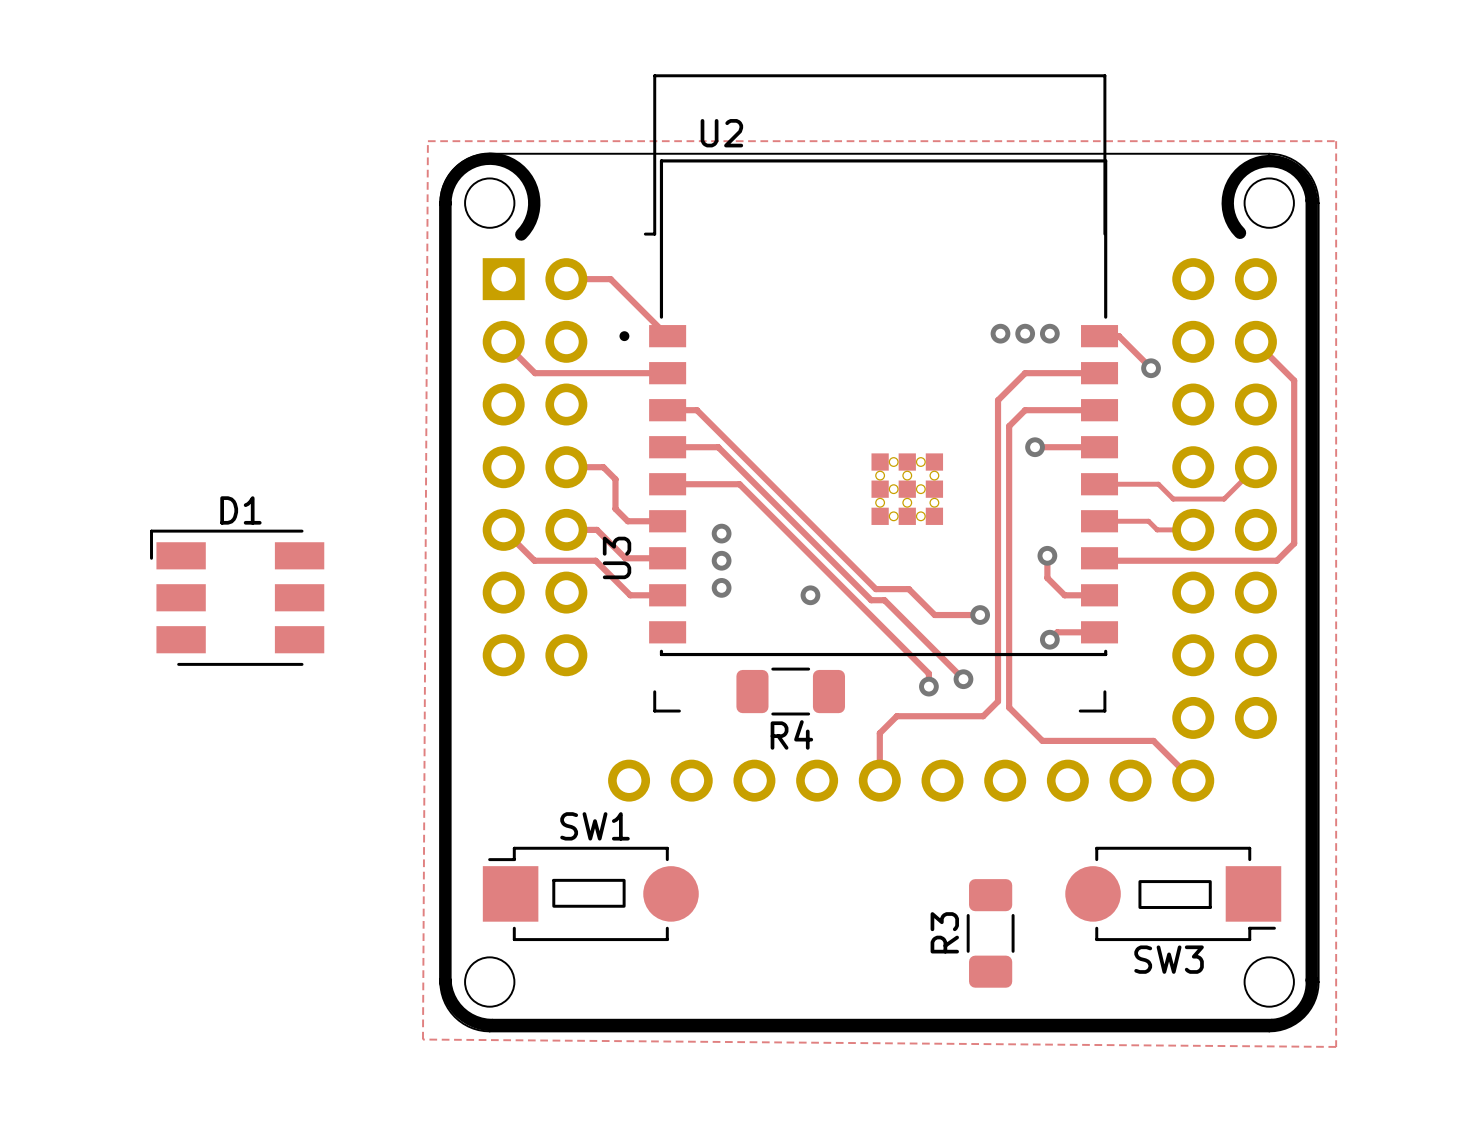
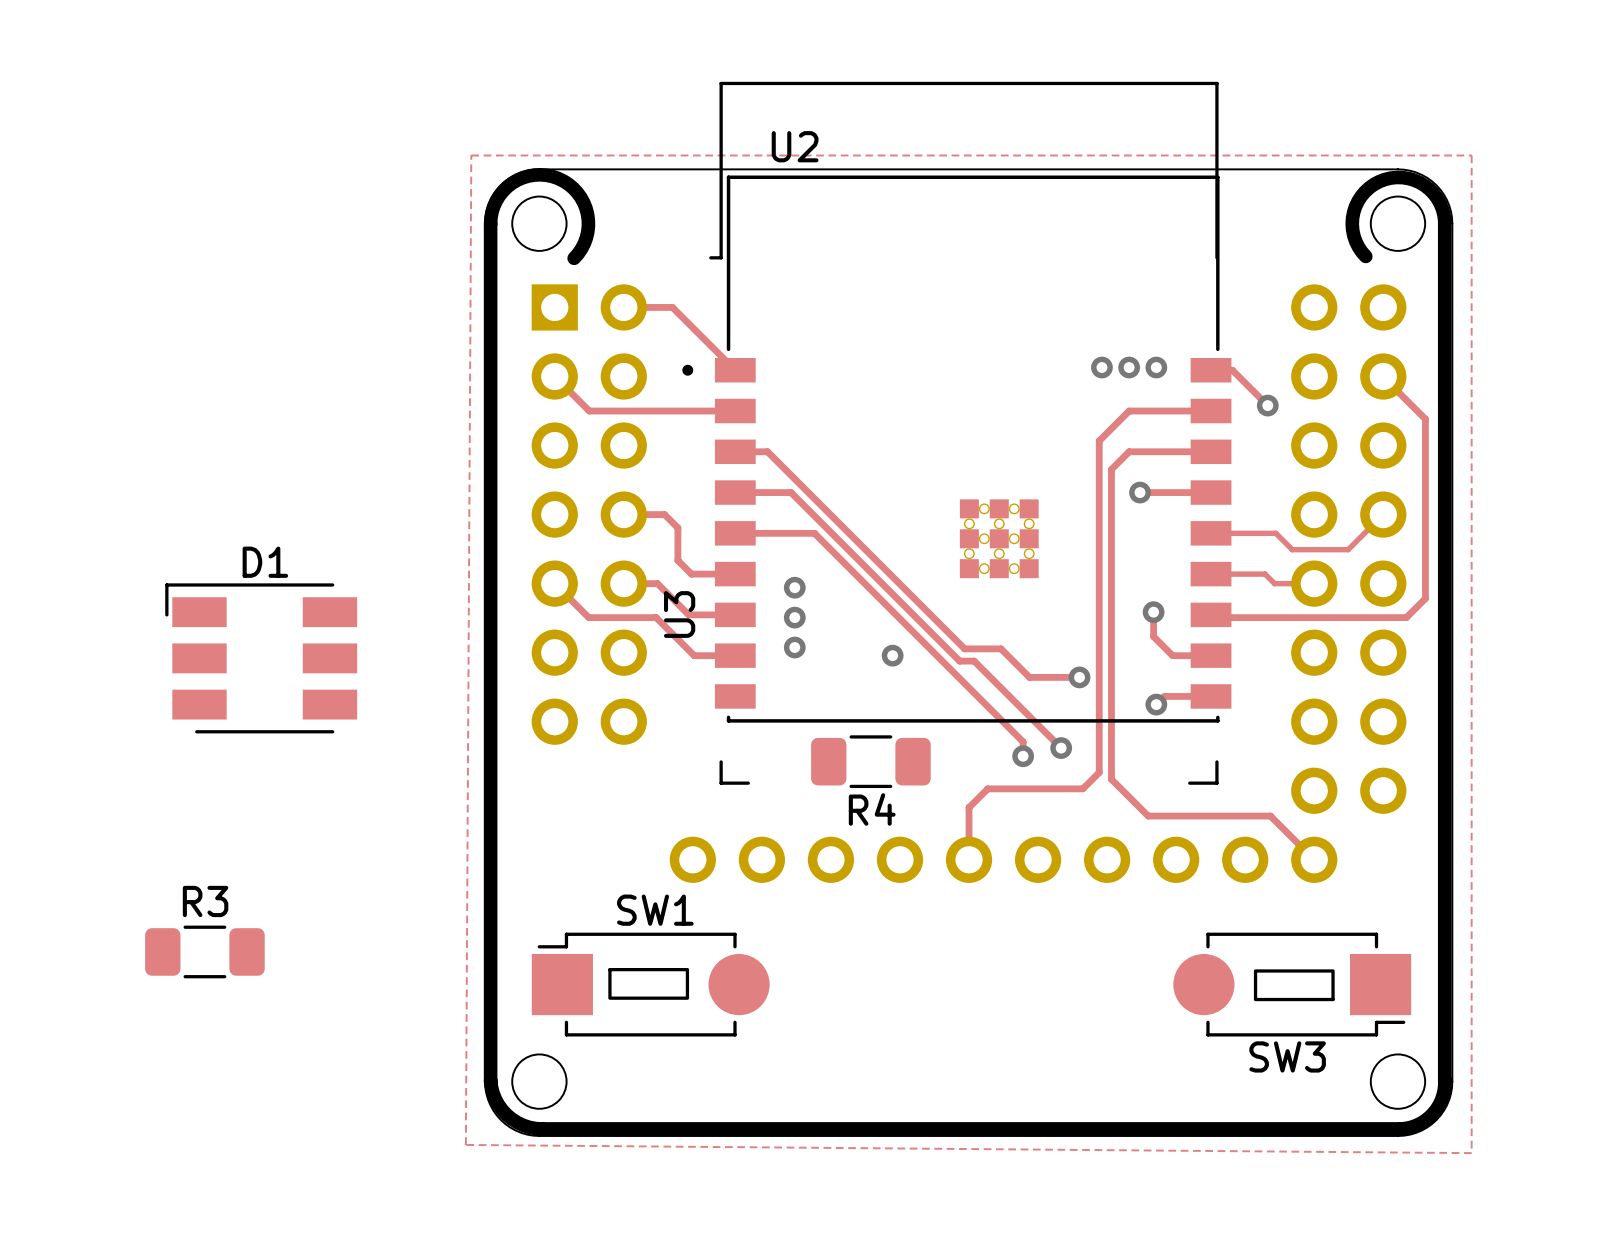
R3 rotation: 0° (990, 933) -> 90° clockwise (204, 951)
R3 position: (990, 933) -> (204, 951)

